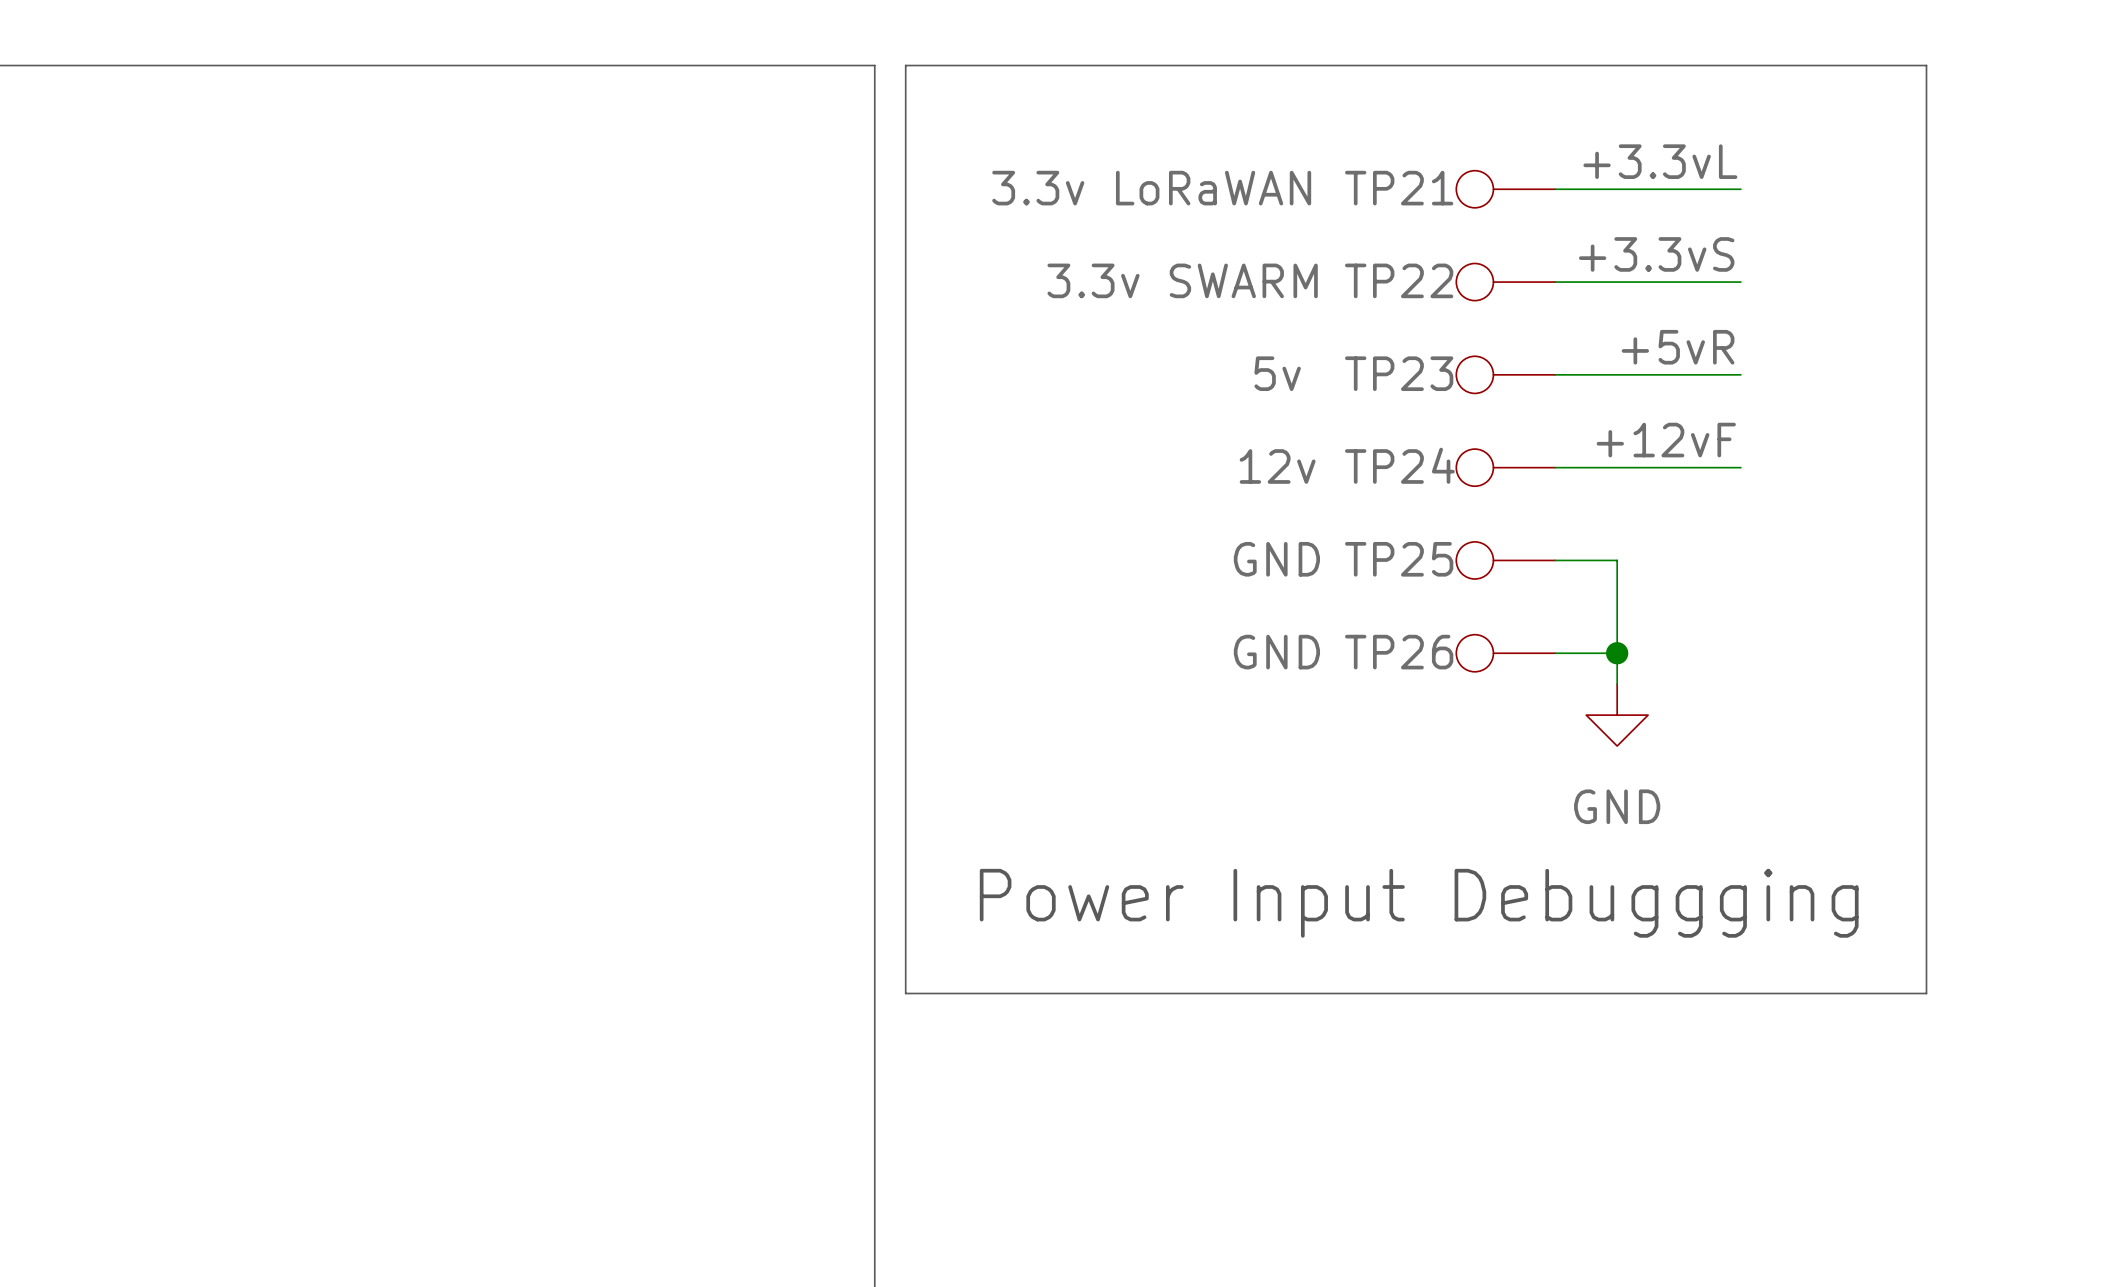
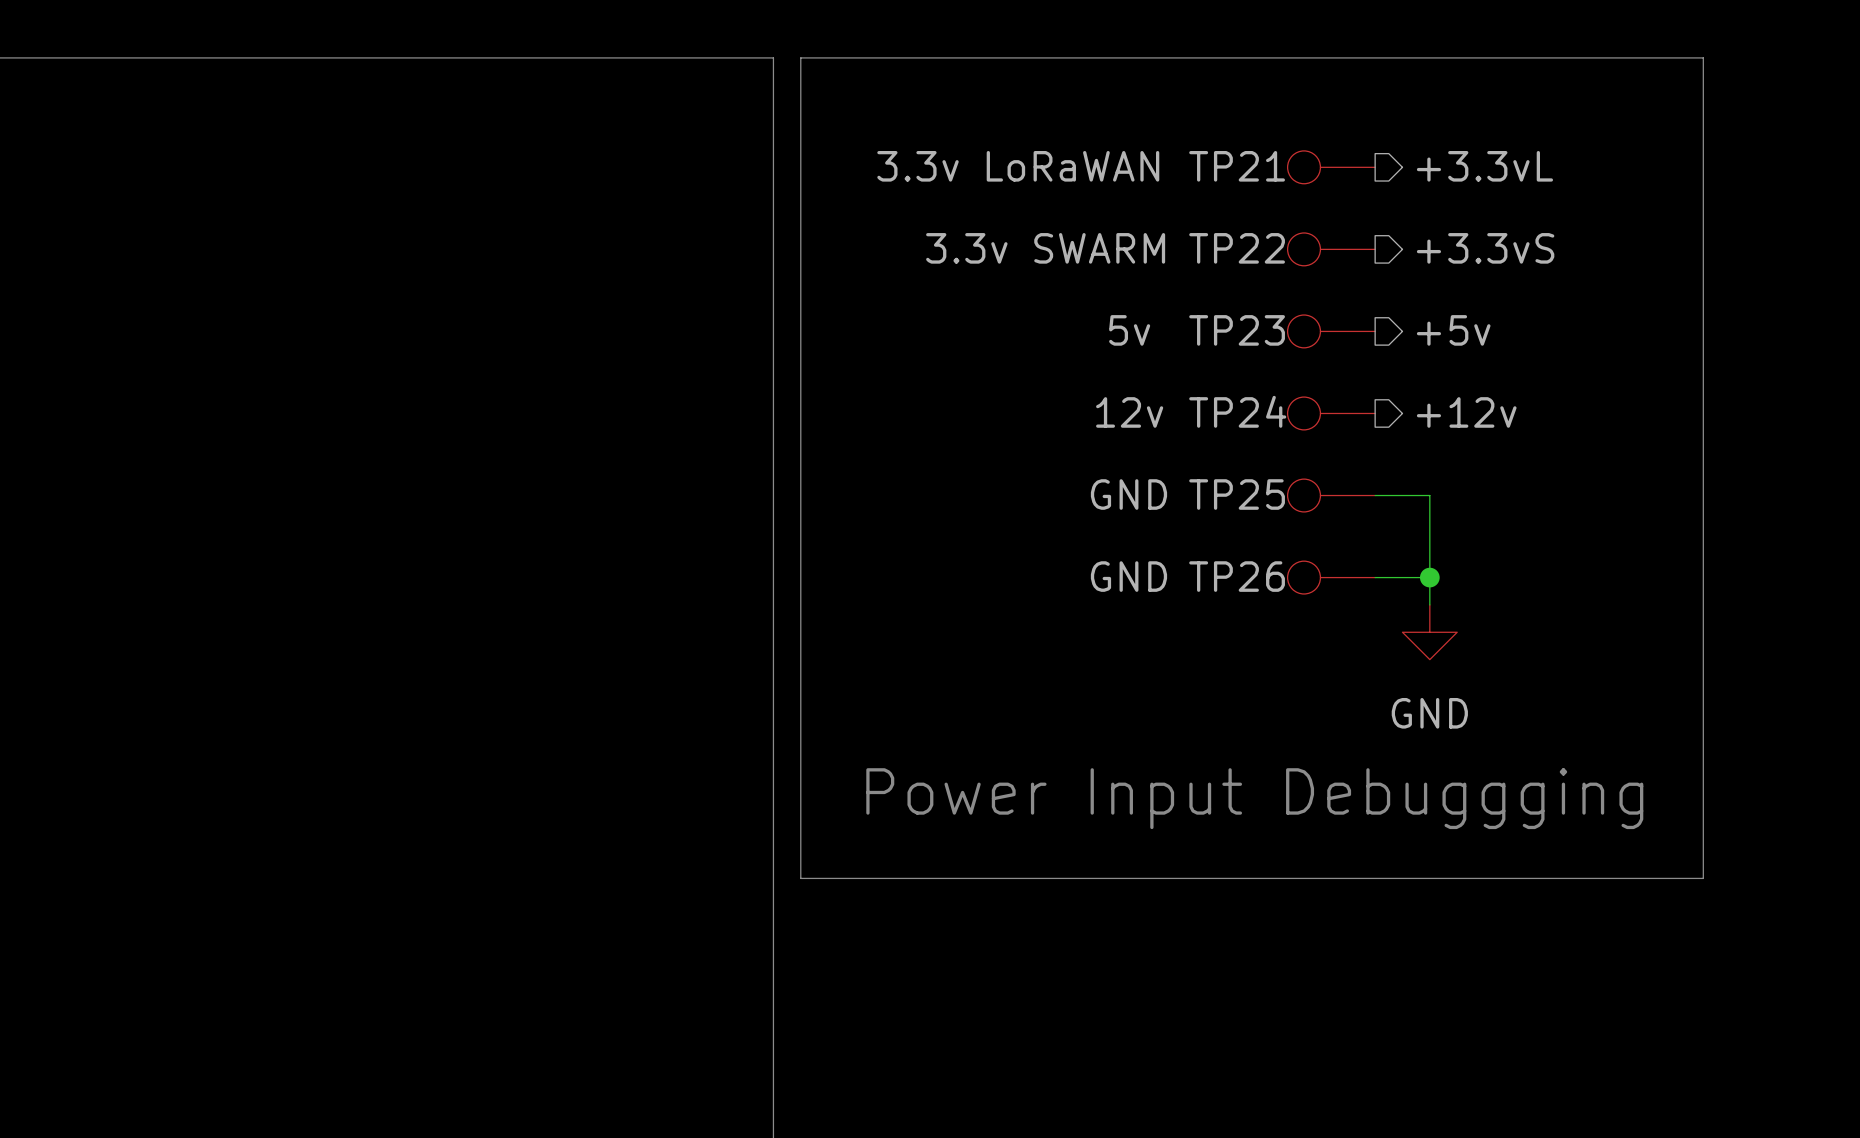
label: +3.3vL (1660, 161) -> none
hierarchical label: none -> +3.3vL (1484, 166)
wire: (1555, 189) (1740, 189) -> none
label: +3.3vS (1656, 254) -> none
hierarchical label: none -> +3.3vS (1485, 248)
wire: (1555, 282) (1740, 282) -> none
label: +5vR (1678, 347) -> none
hierarchical label: none -> +5v (1453, 330)
wire: (1555, 374) (1740, 374) -> none
label: +12vF (1666, 440) -> none
hierarchical label: none -> +12v (1466, 412)
wire: (1555, 467) (1740, 467) -> none

